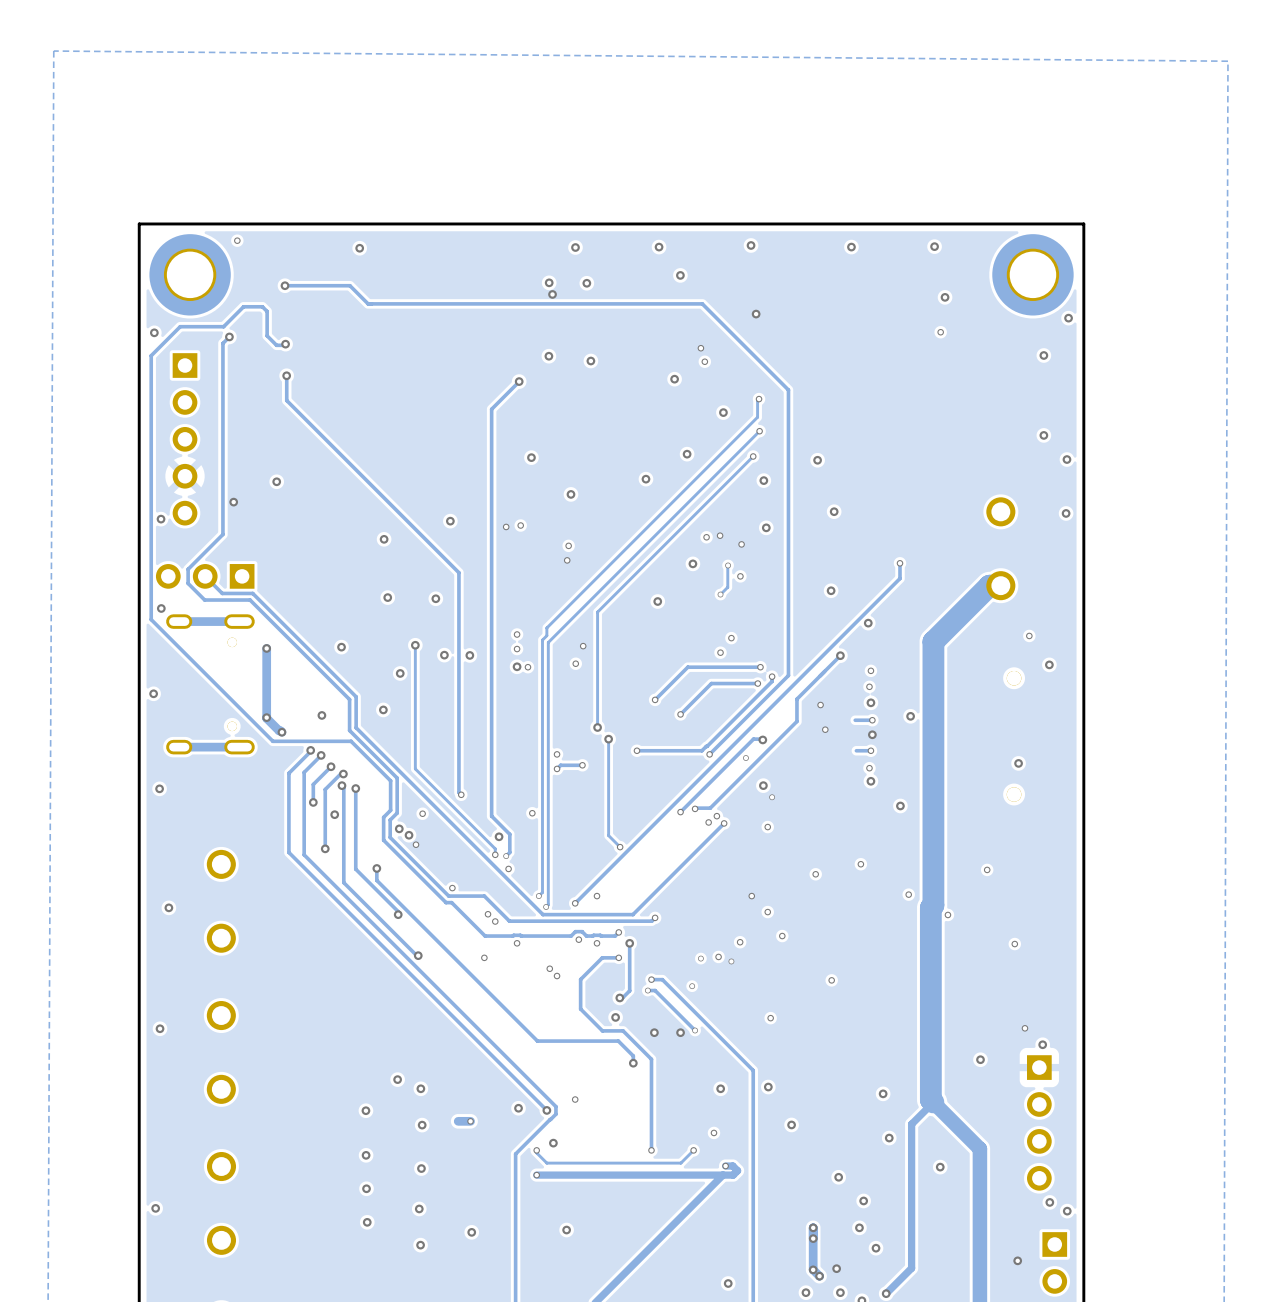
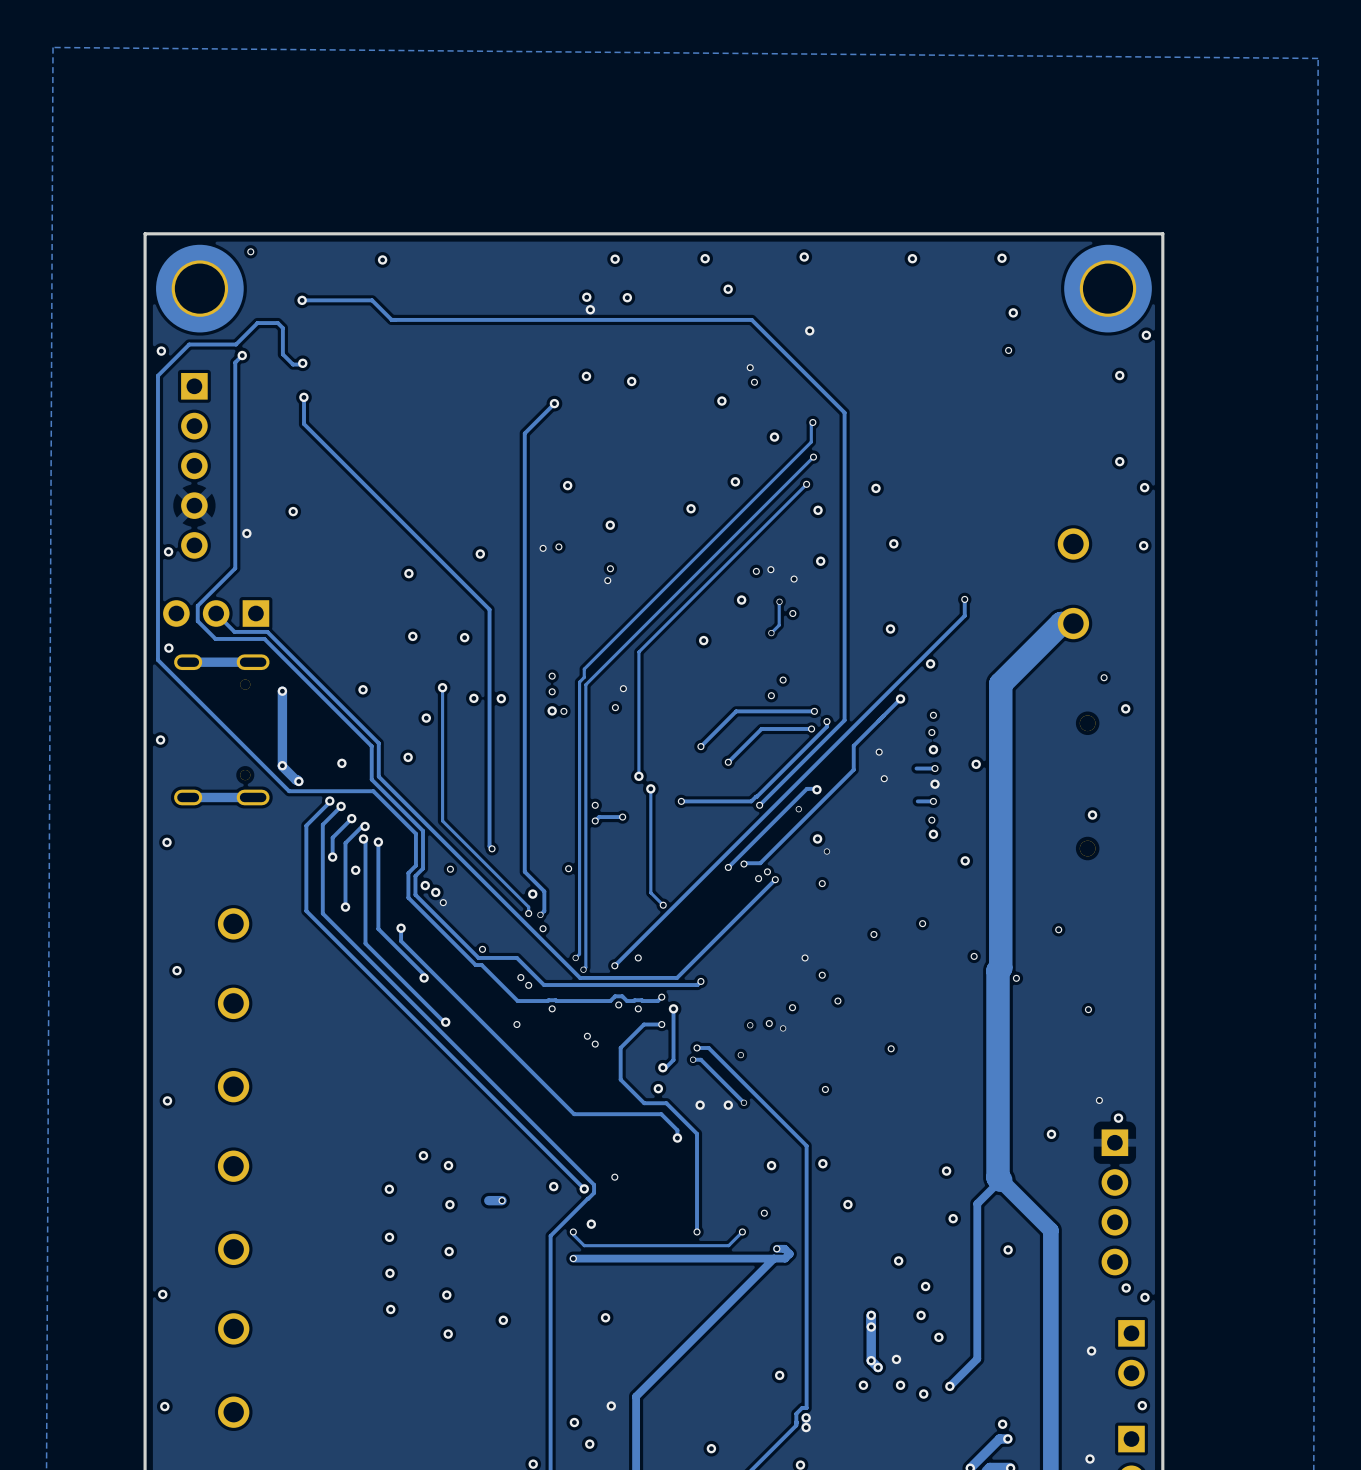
via: none -> (558, 546)
via: none -> (543, 548)
via: (520, 525) -> none
via: (506, 526) -> none
via: none -> (610, 568)
via: (567, 560) -> none

